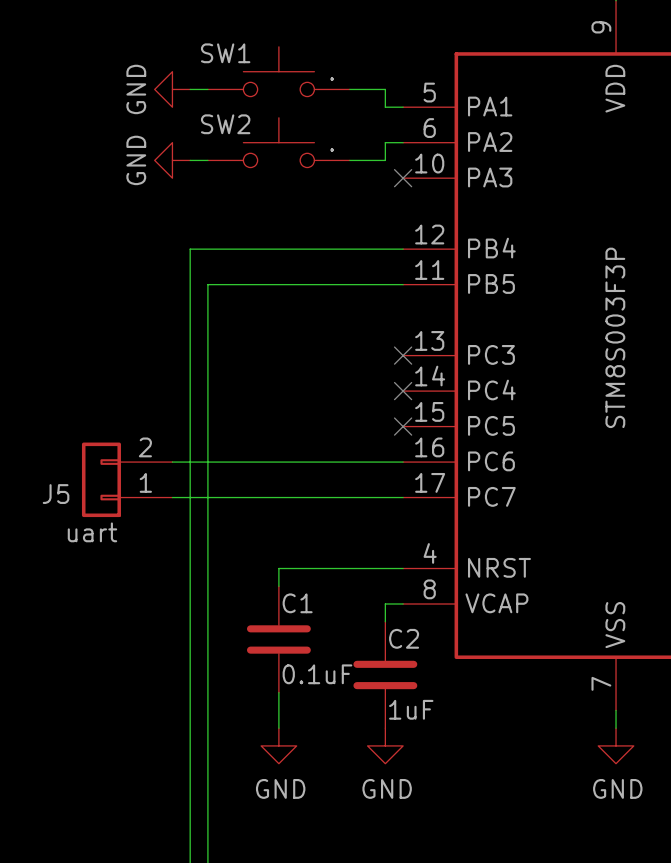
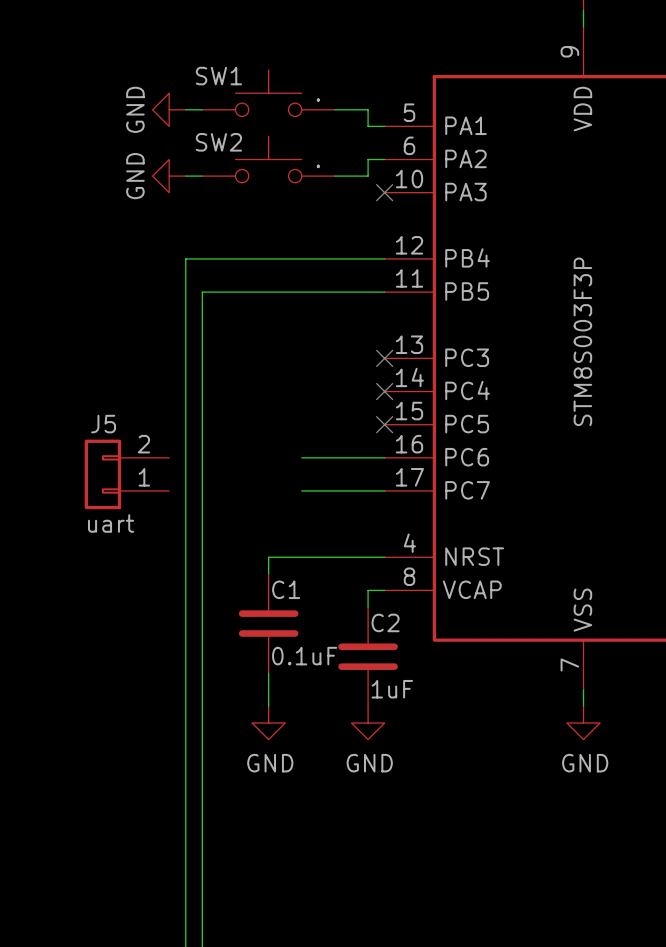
wire: (172, 462) (314, 462) -> none
J5 name position: J5 (56, 494) -> J5 (103, 424)
wire: (172, 497) (314, 497) -> none
J5 value position: uart (92, 532) -> uart (111, 523)

